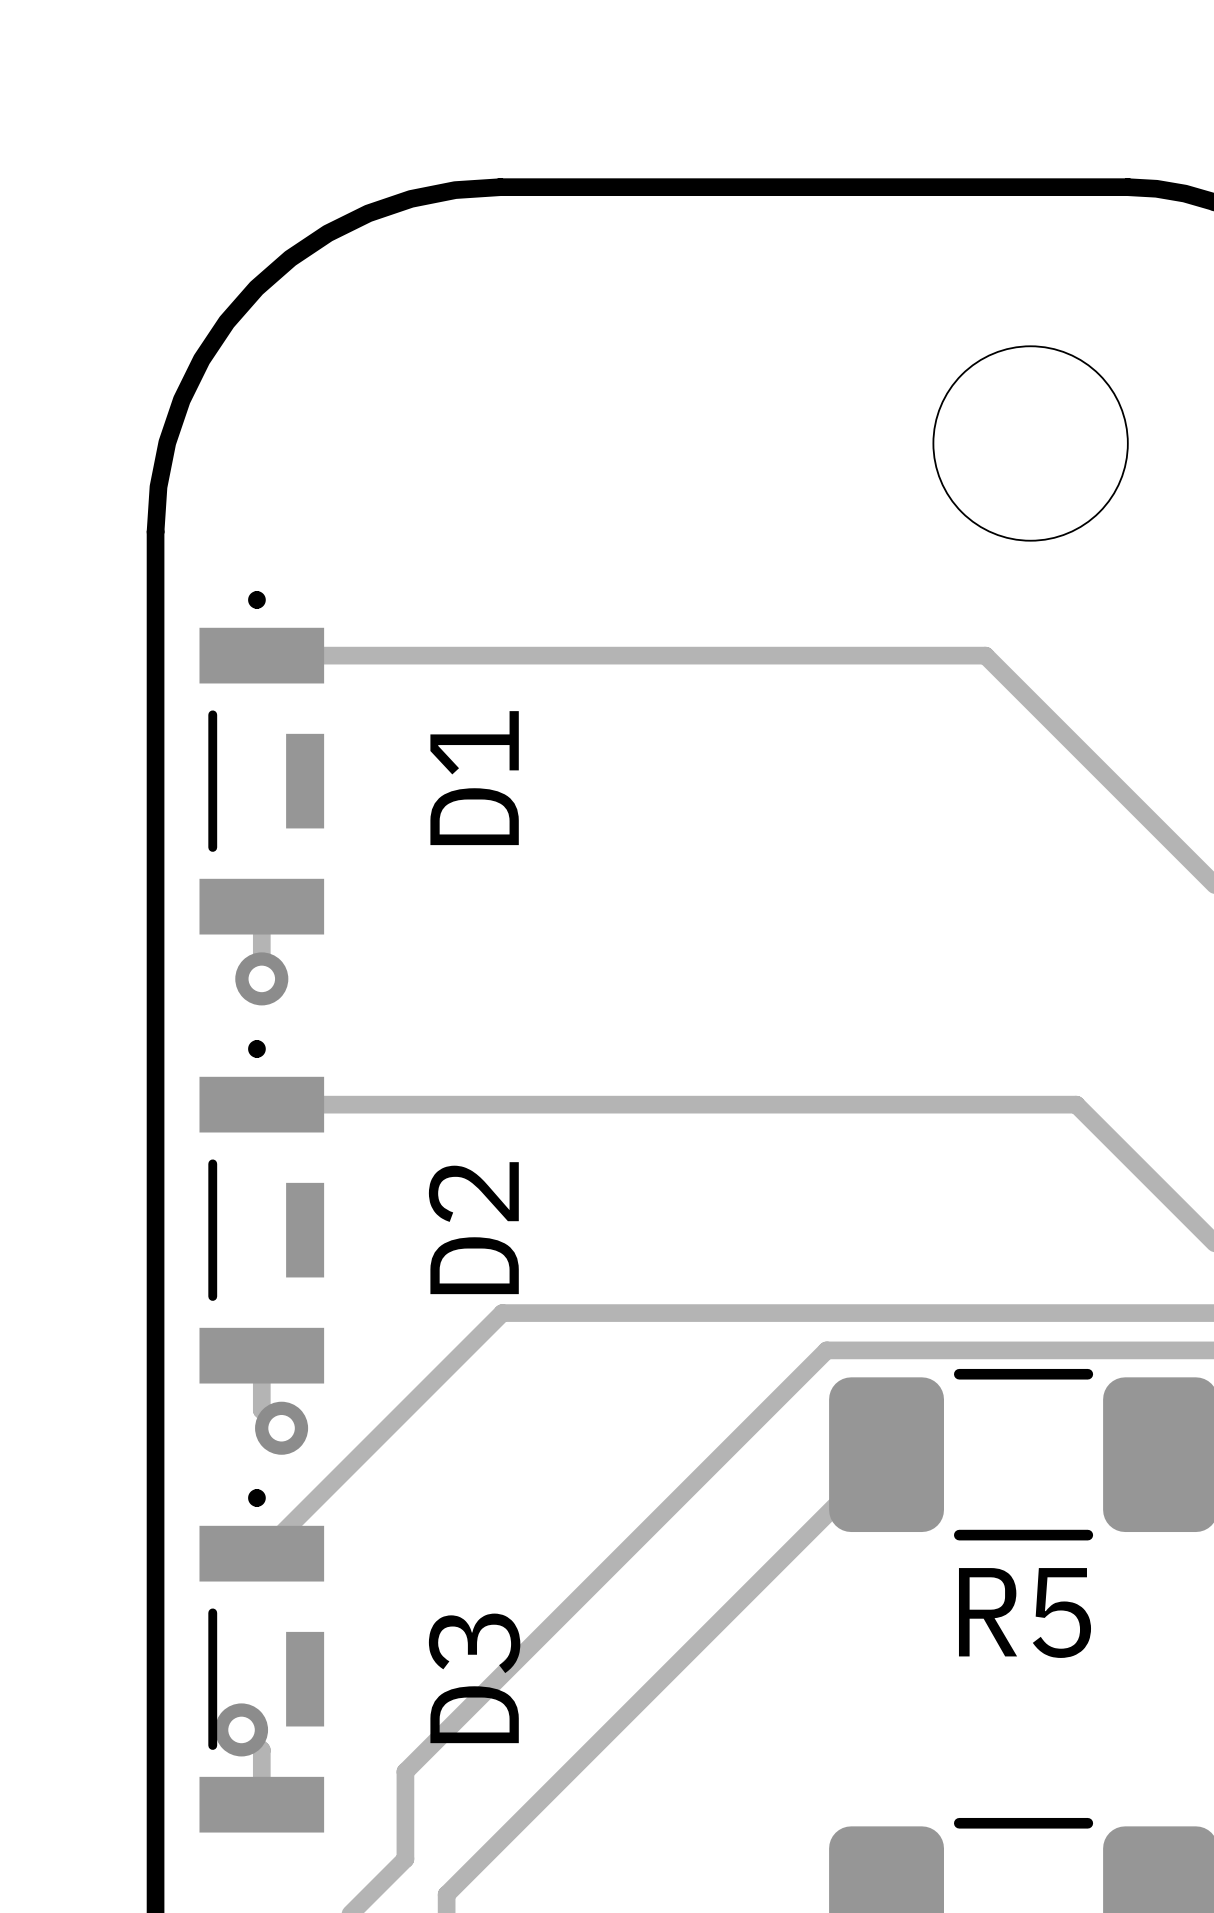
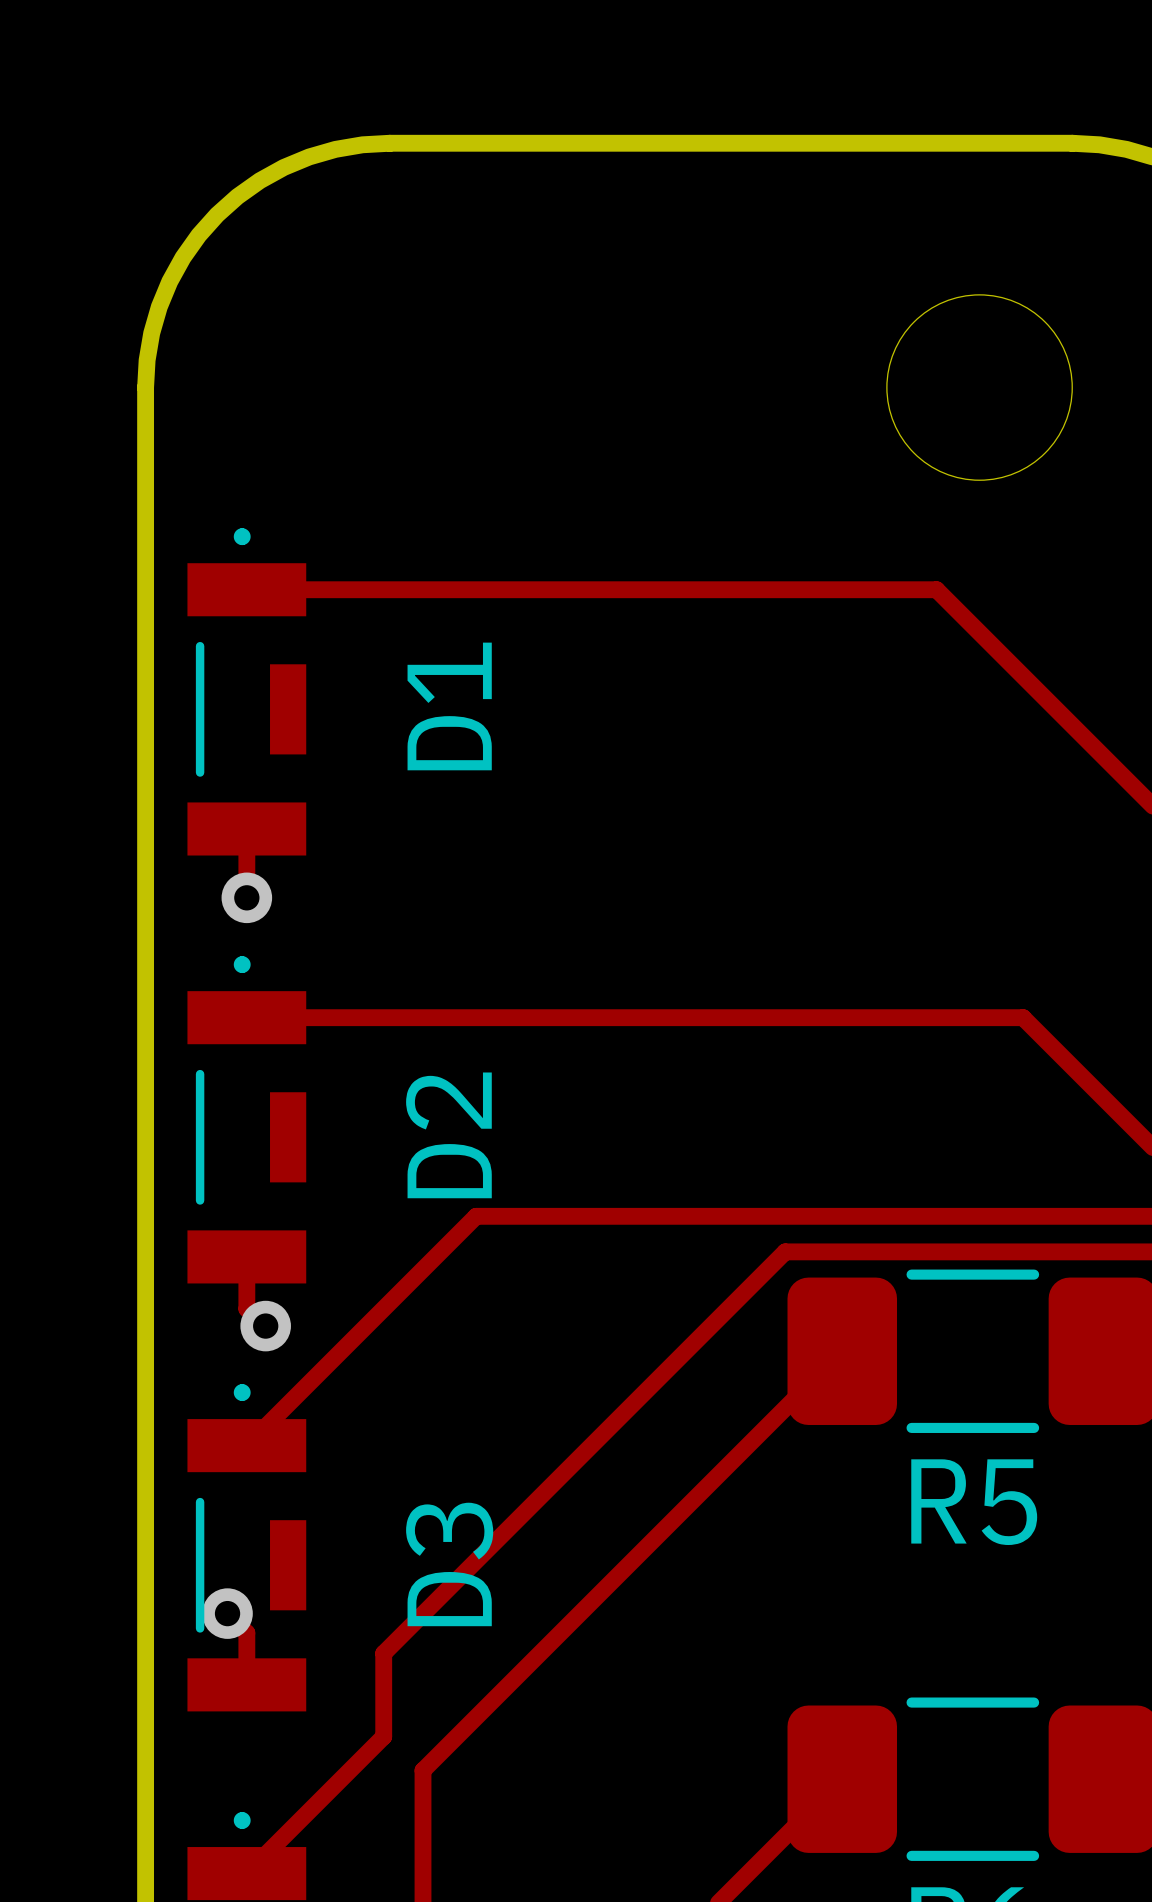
board edge: (500, 187) (455, 190) (411, 198) (368, 213) (327, 233) (290, 258) (256, 288) (226, 322) (201, 359) (181, 399) (167, 442) (158, 486) (155, 531) -> (474, 143) (389, 143) (362, 144) (335, 149) (309, 156) (283, 167) (259, 180) (237, 196) (217, 214) (198, 235) (183, 257) (169, 281) (159, 306) (151, 333) (147, 360) (145, 387) (145, 471)

